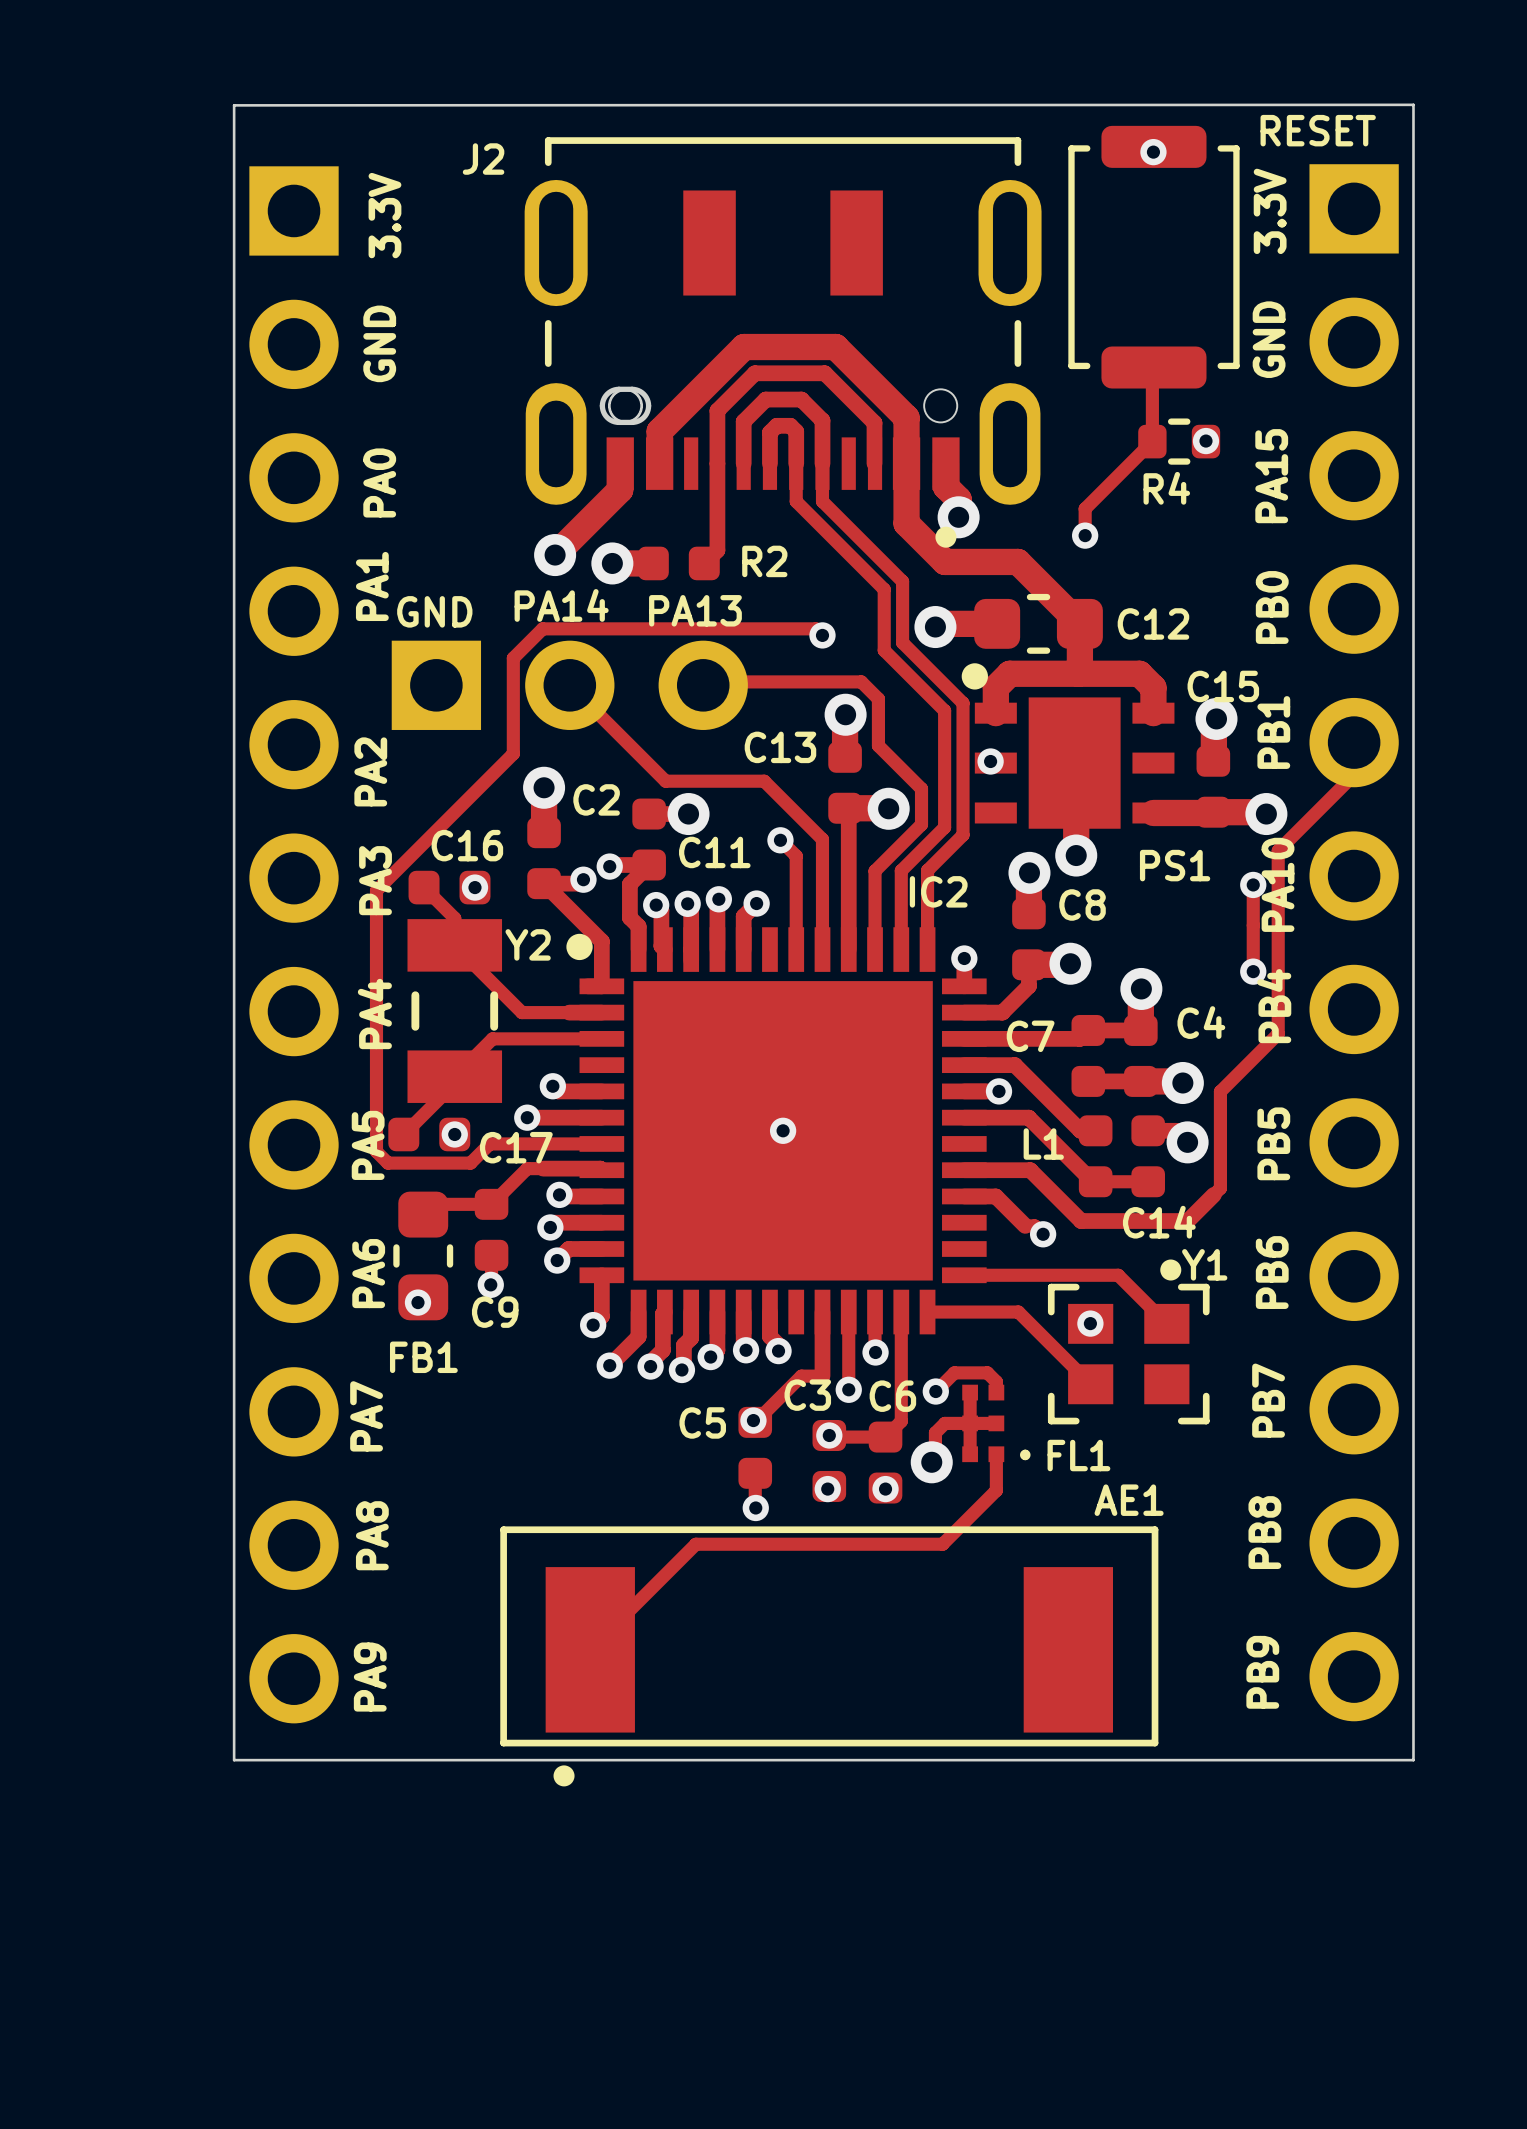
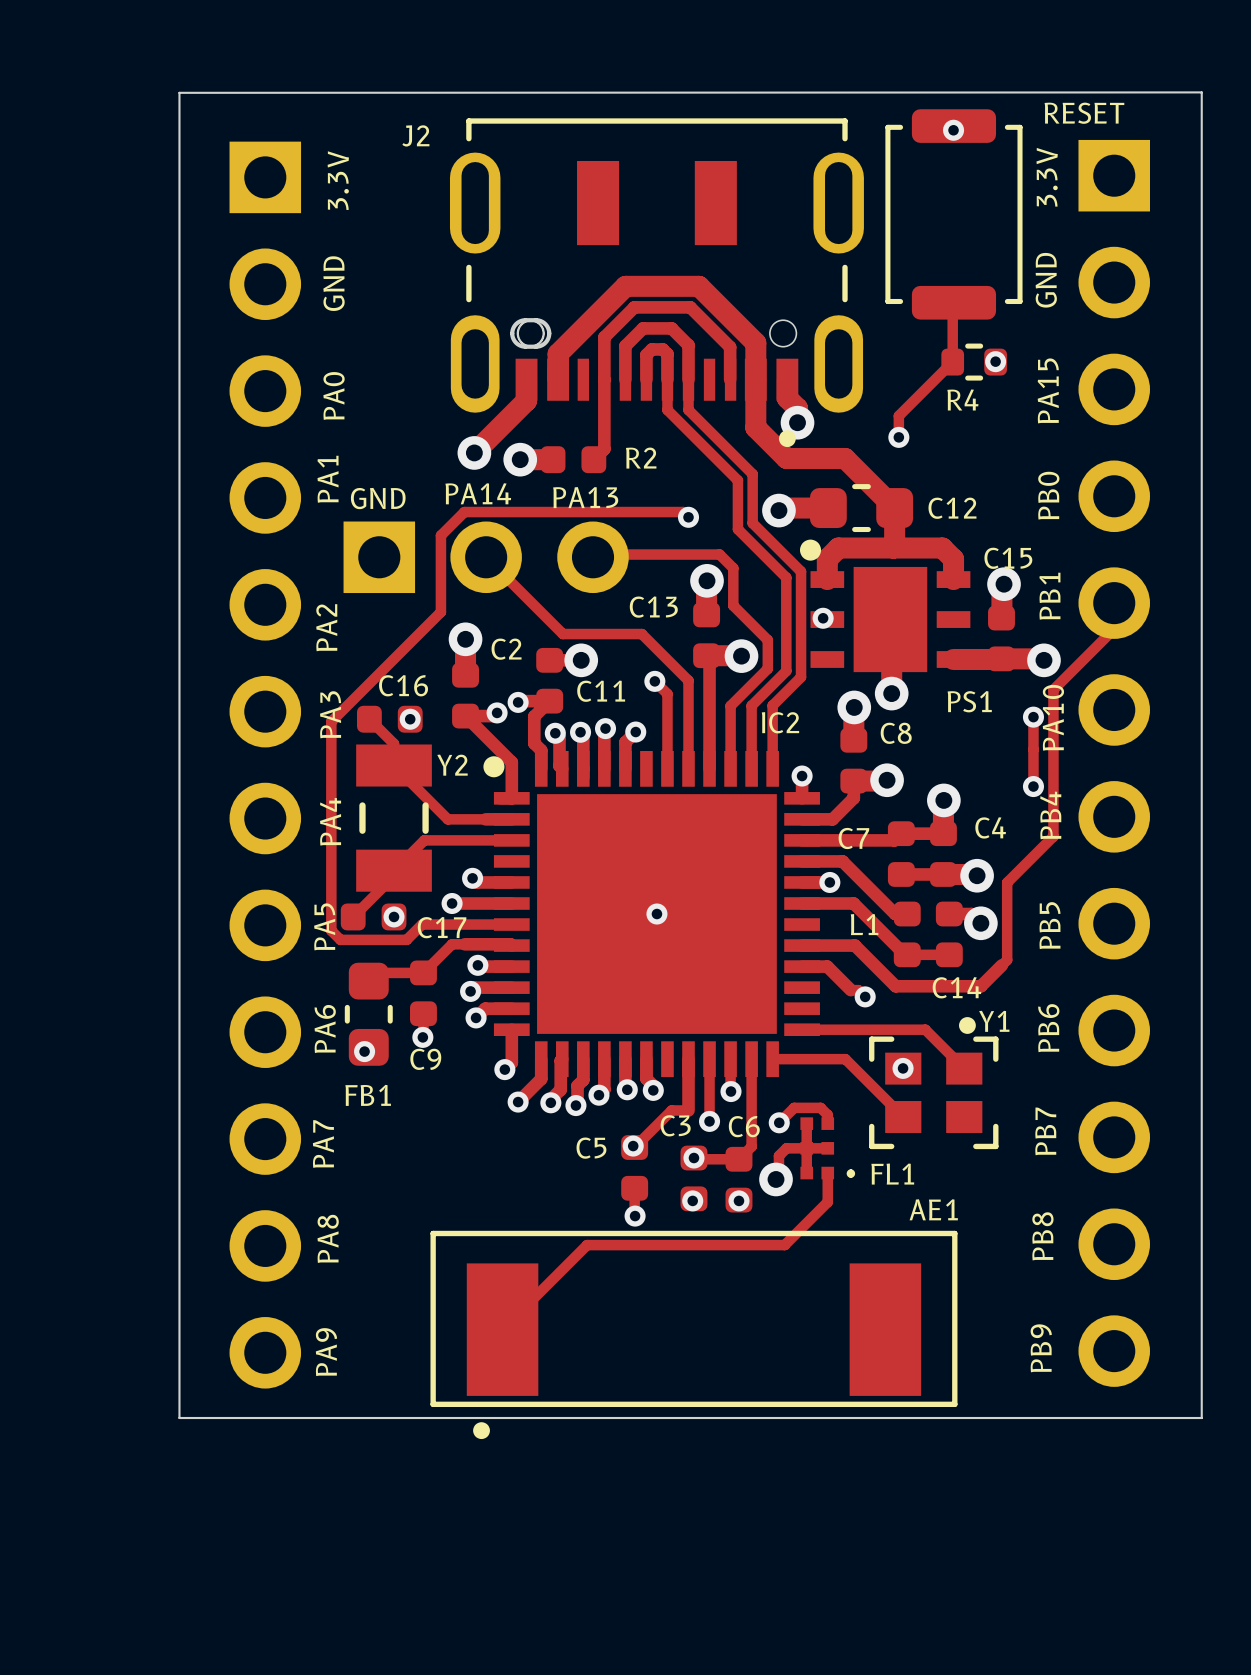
board edge: (234, 1760) (234, 105) (1413, 104) (1413, 1760) -> (217, 1418) (179, 1418) (179, 92) (1201, 92) (1201, 1418) (1161, 1418)

